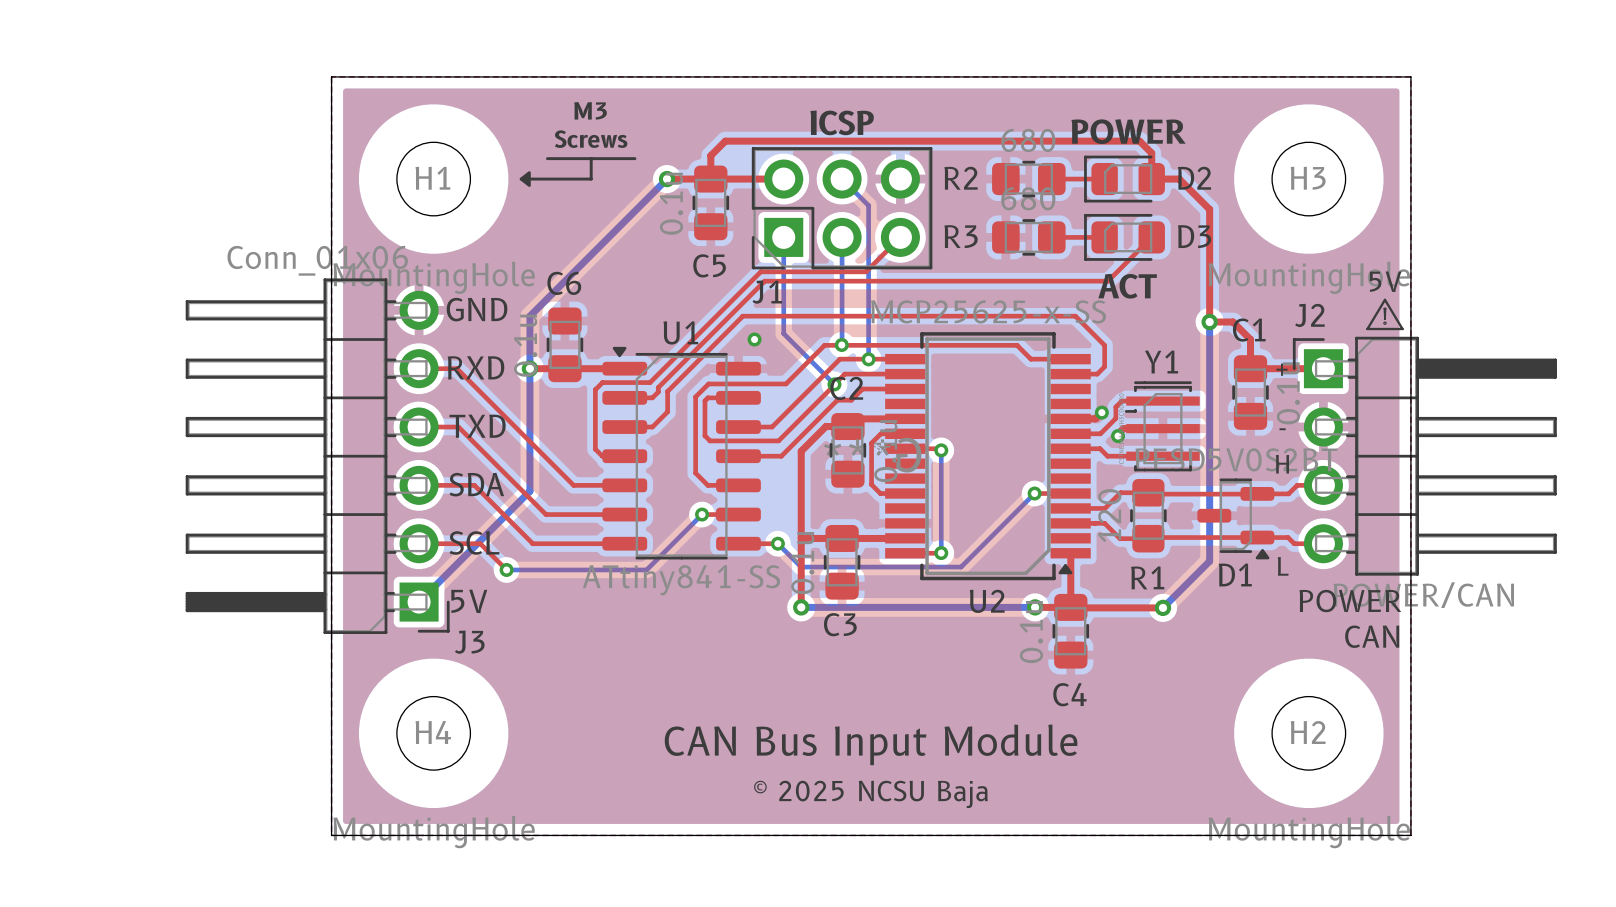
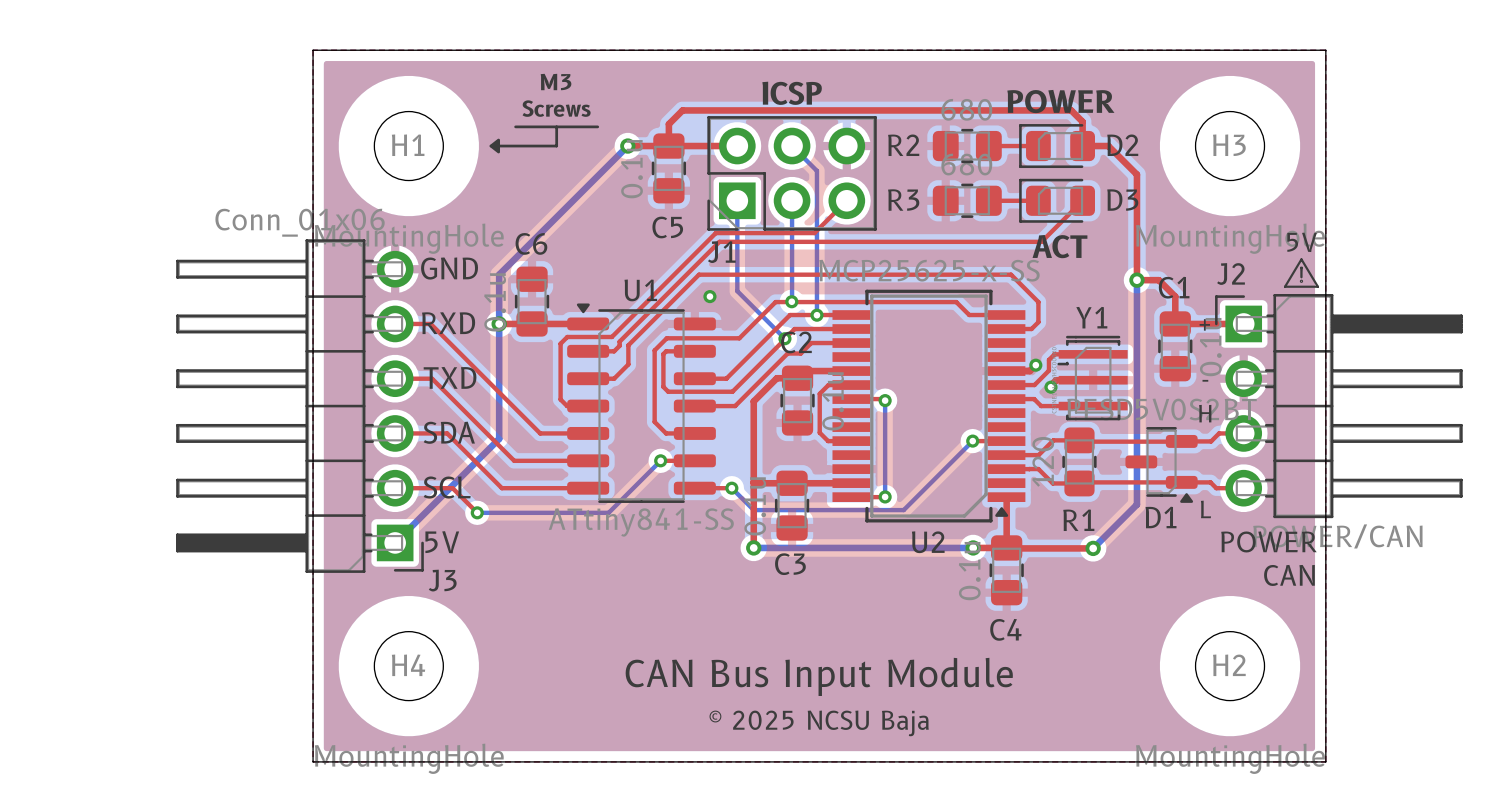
part: (872, 455) -> none

